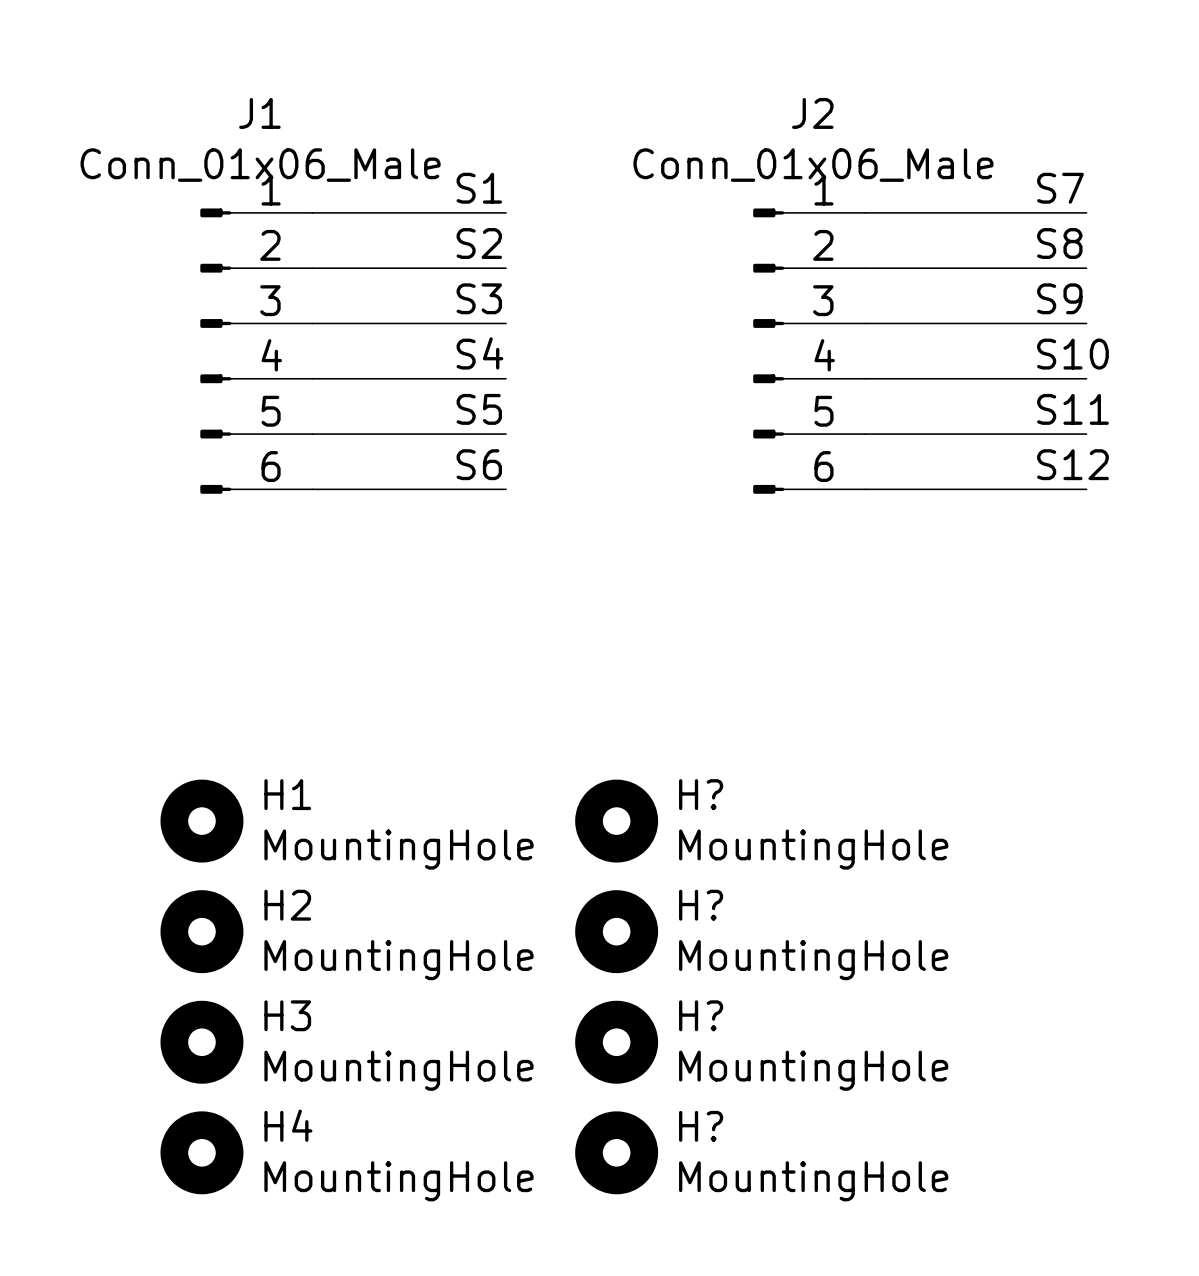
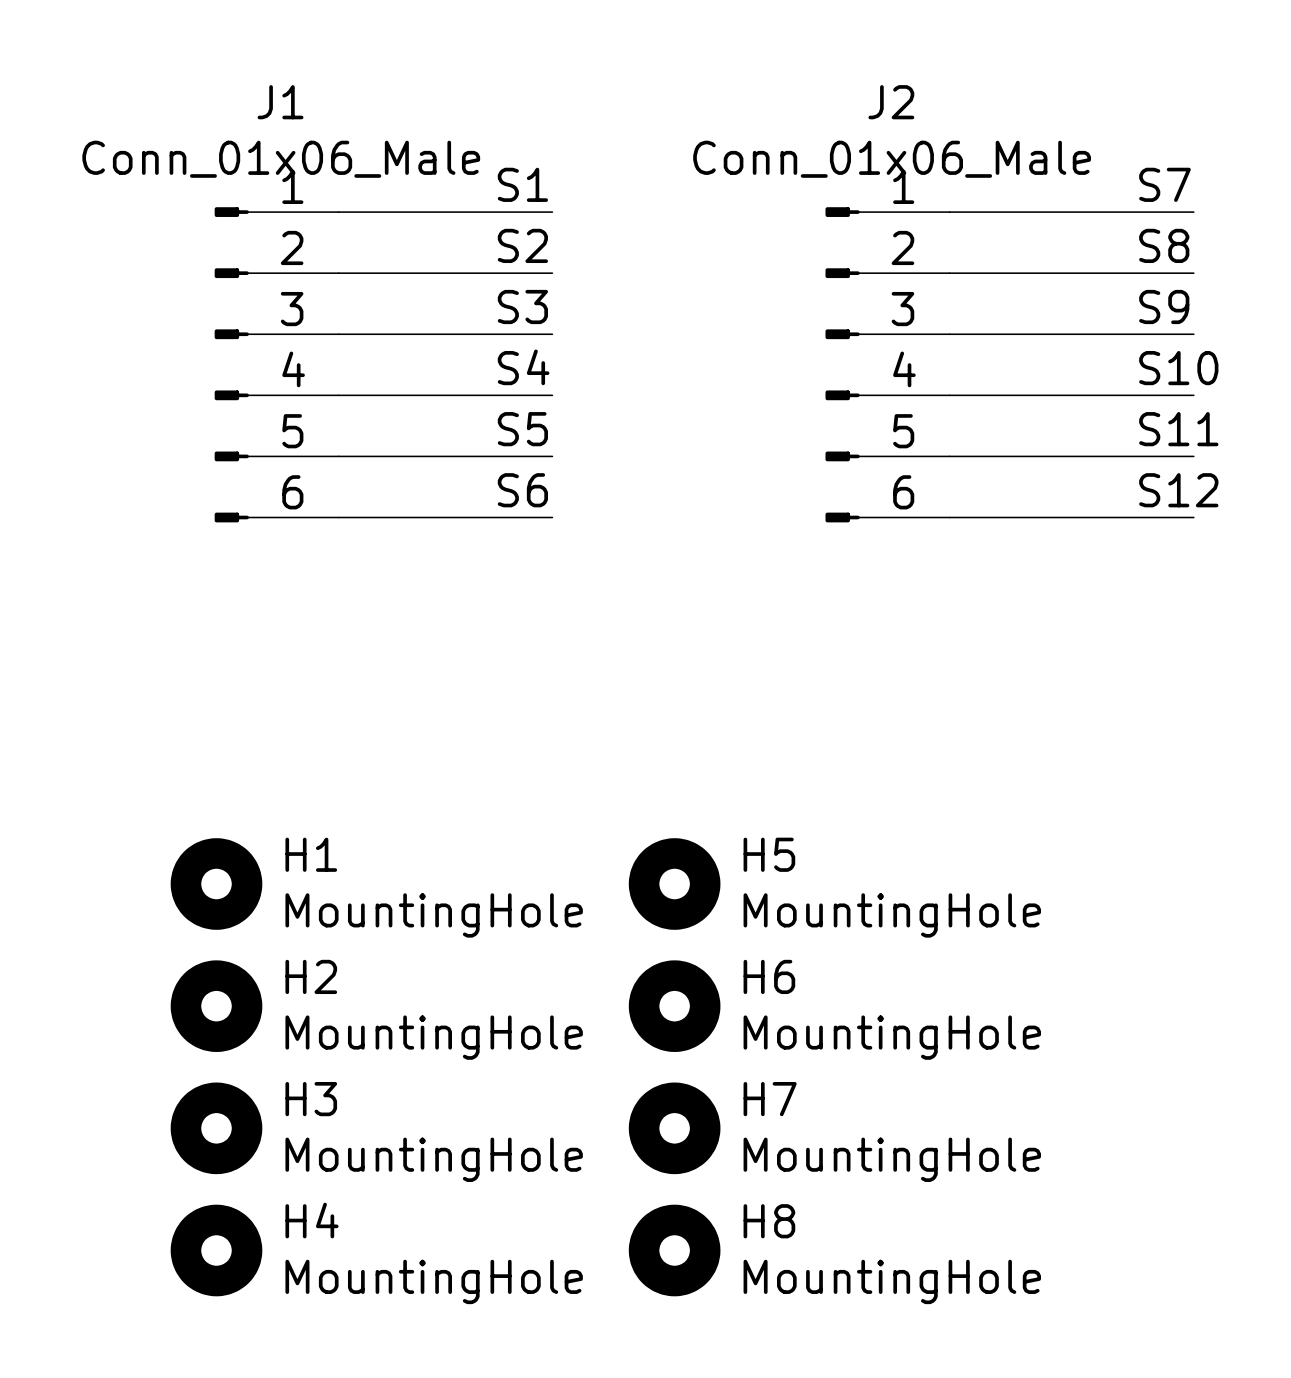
H? name: H? (701, 794) -> H5 (769, 854)
H? name: H? (701, 905) -> H6 (769, 976)
H? name: H? (701, 1015) -> H7 (770, 1099)
H? name: H? (701, 1126) -> H8 (769, 1221)

